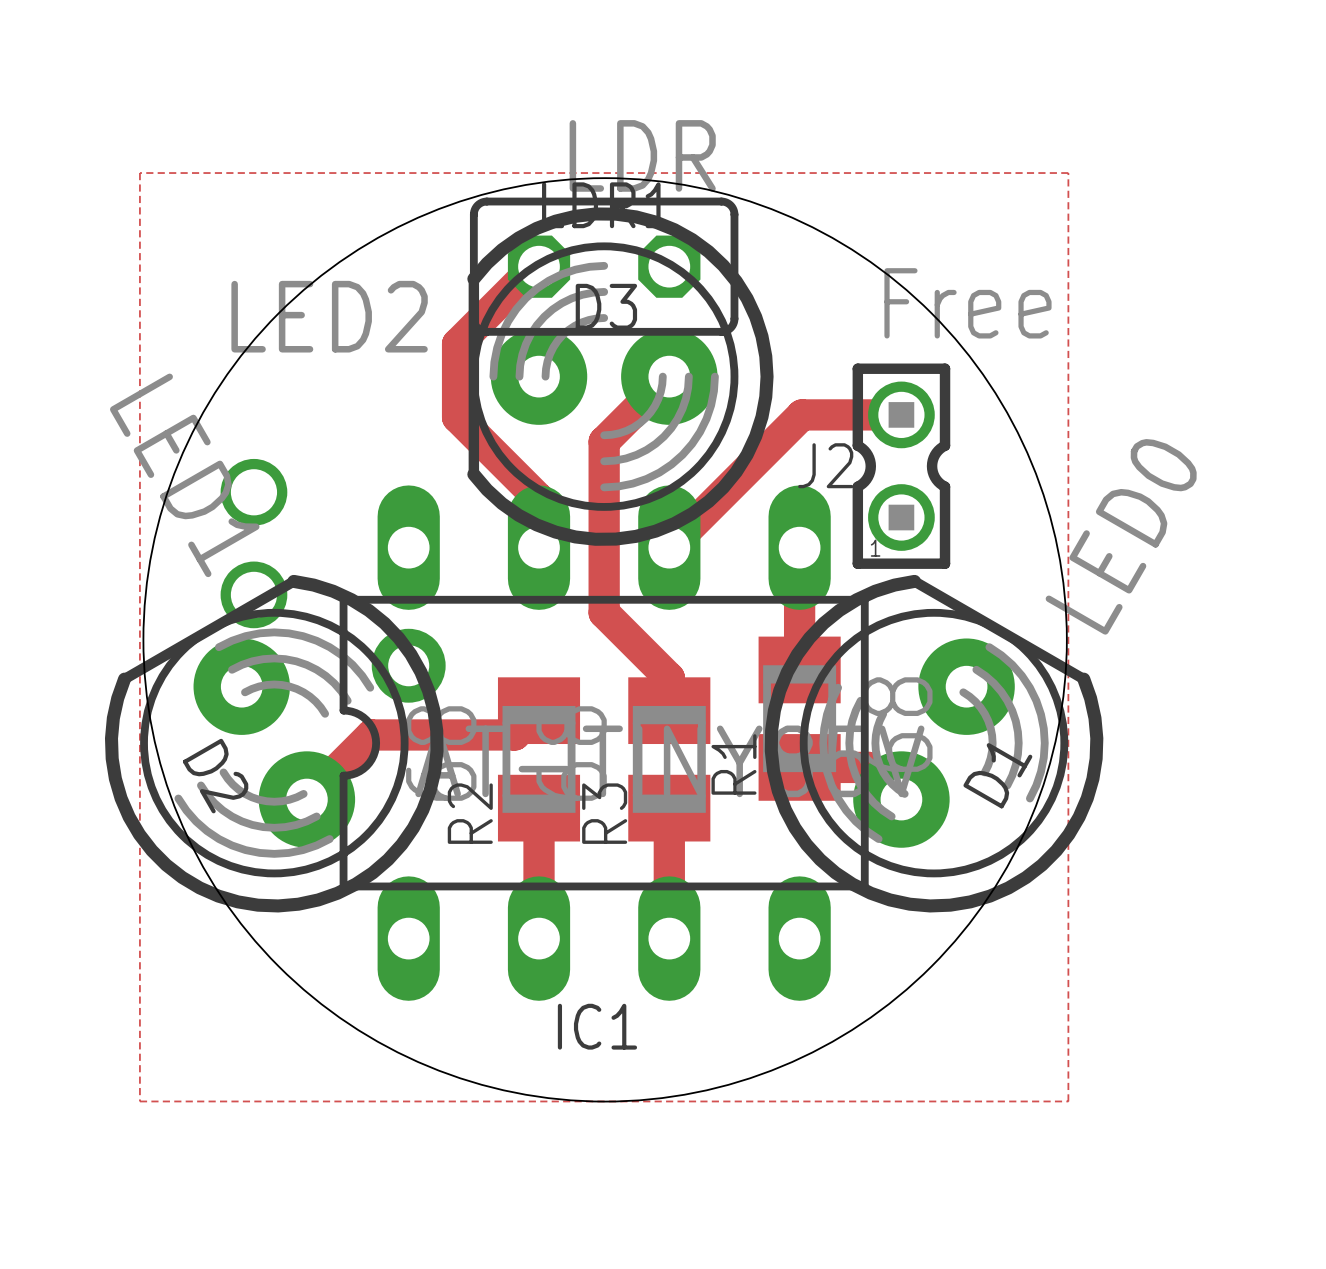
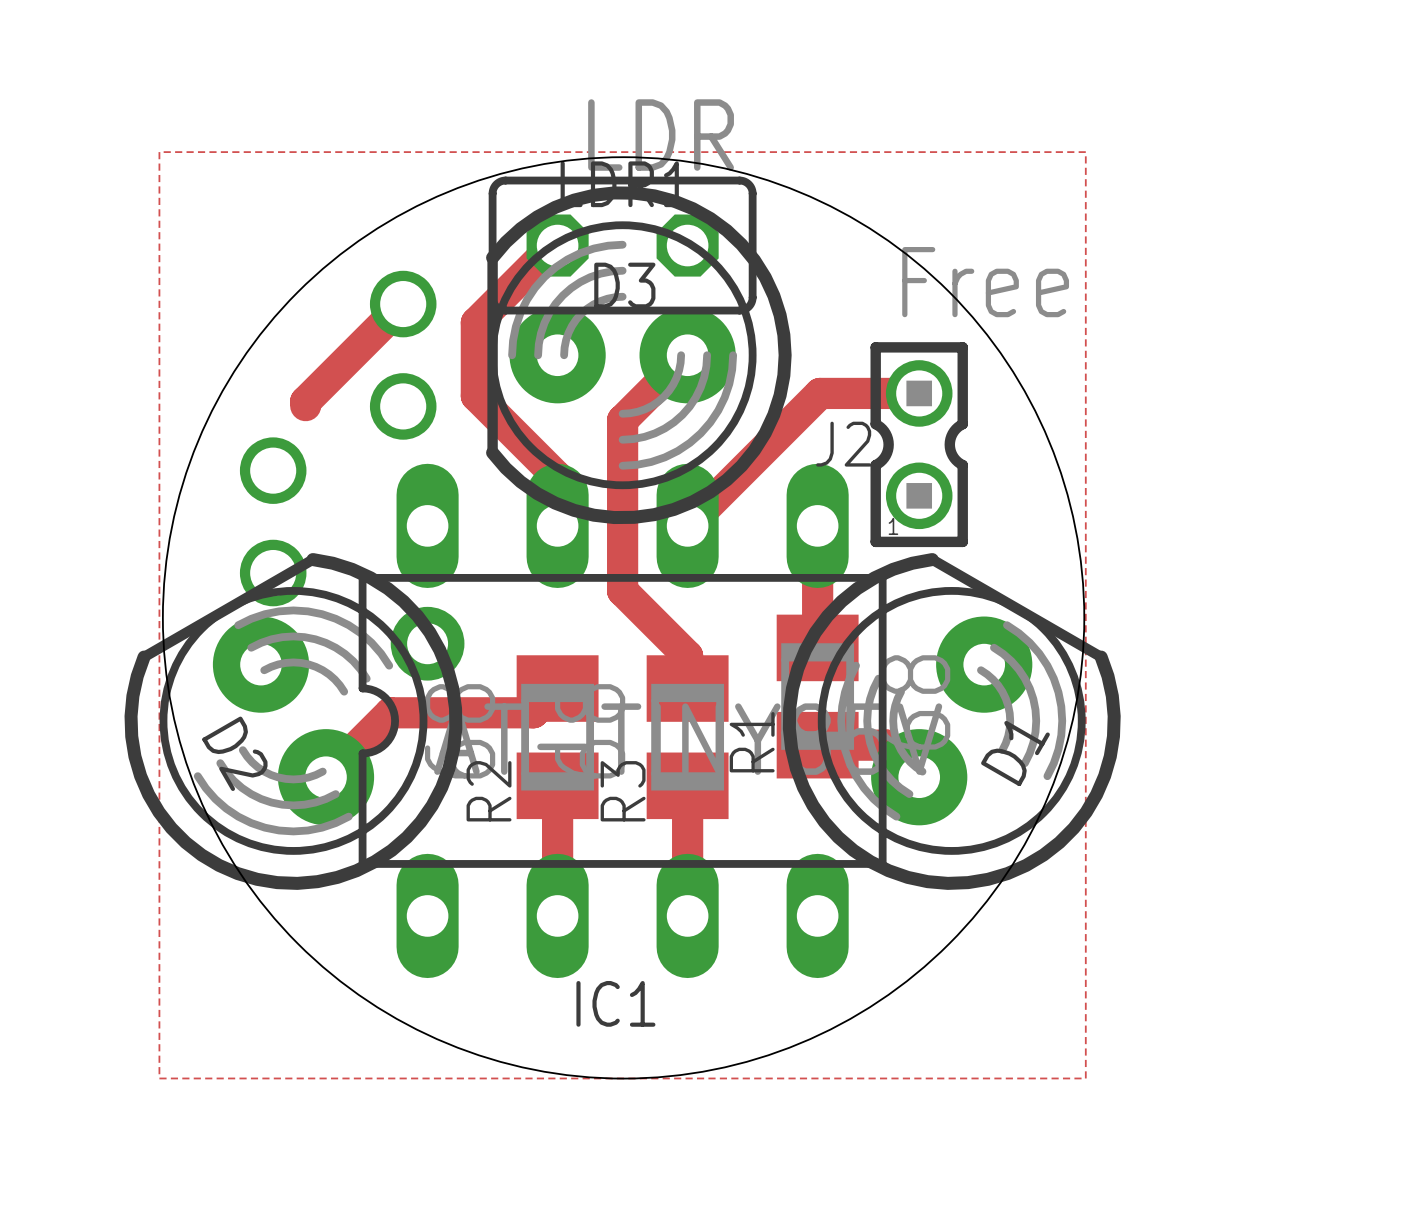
D3 value: LED2 (329, 316) -> none
track: none -> (403, 304) (305, 401) (305, 405)
part: none -> (403, 355)
D2 value: LED1 (184, 475) -> none
D1 value: LED0 (1121, 536) -> none

